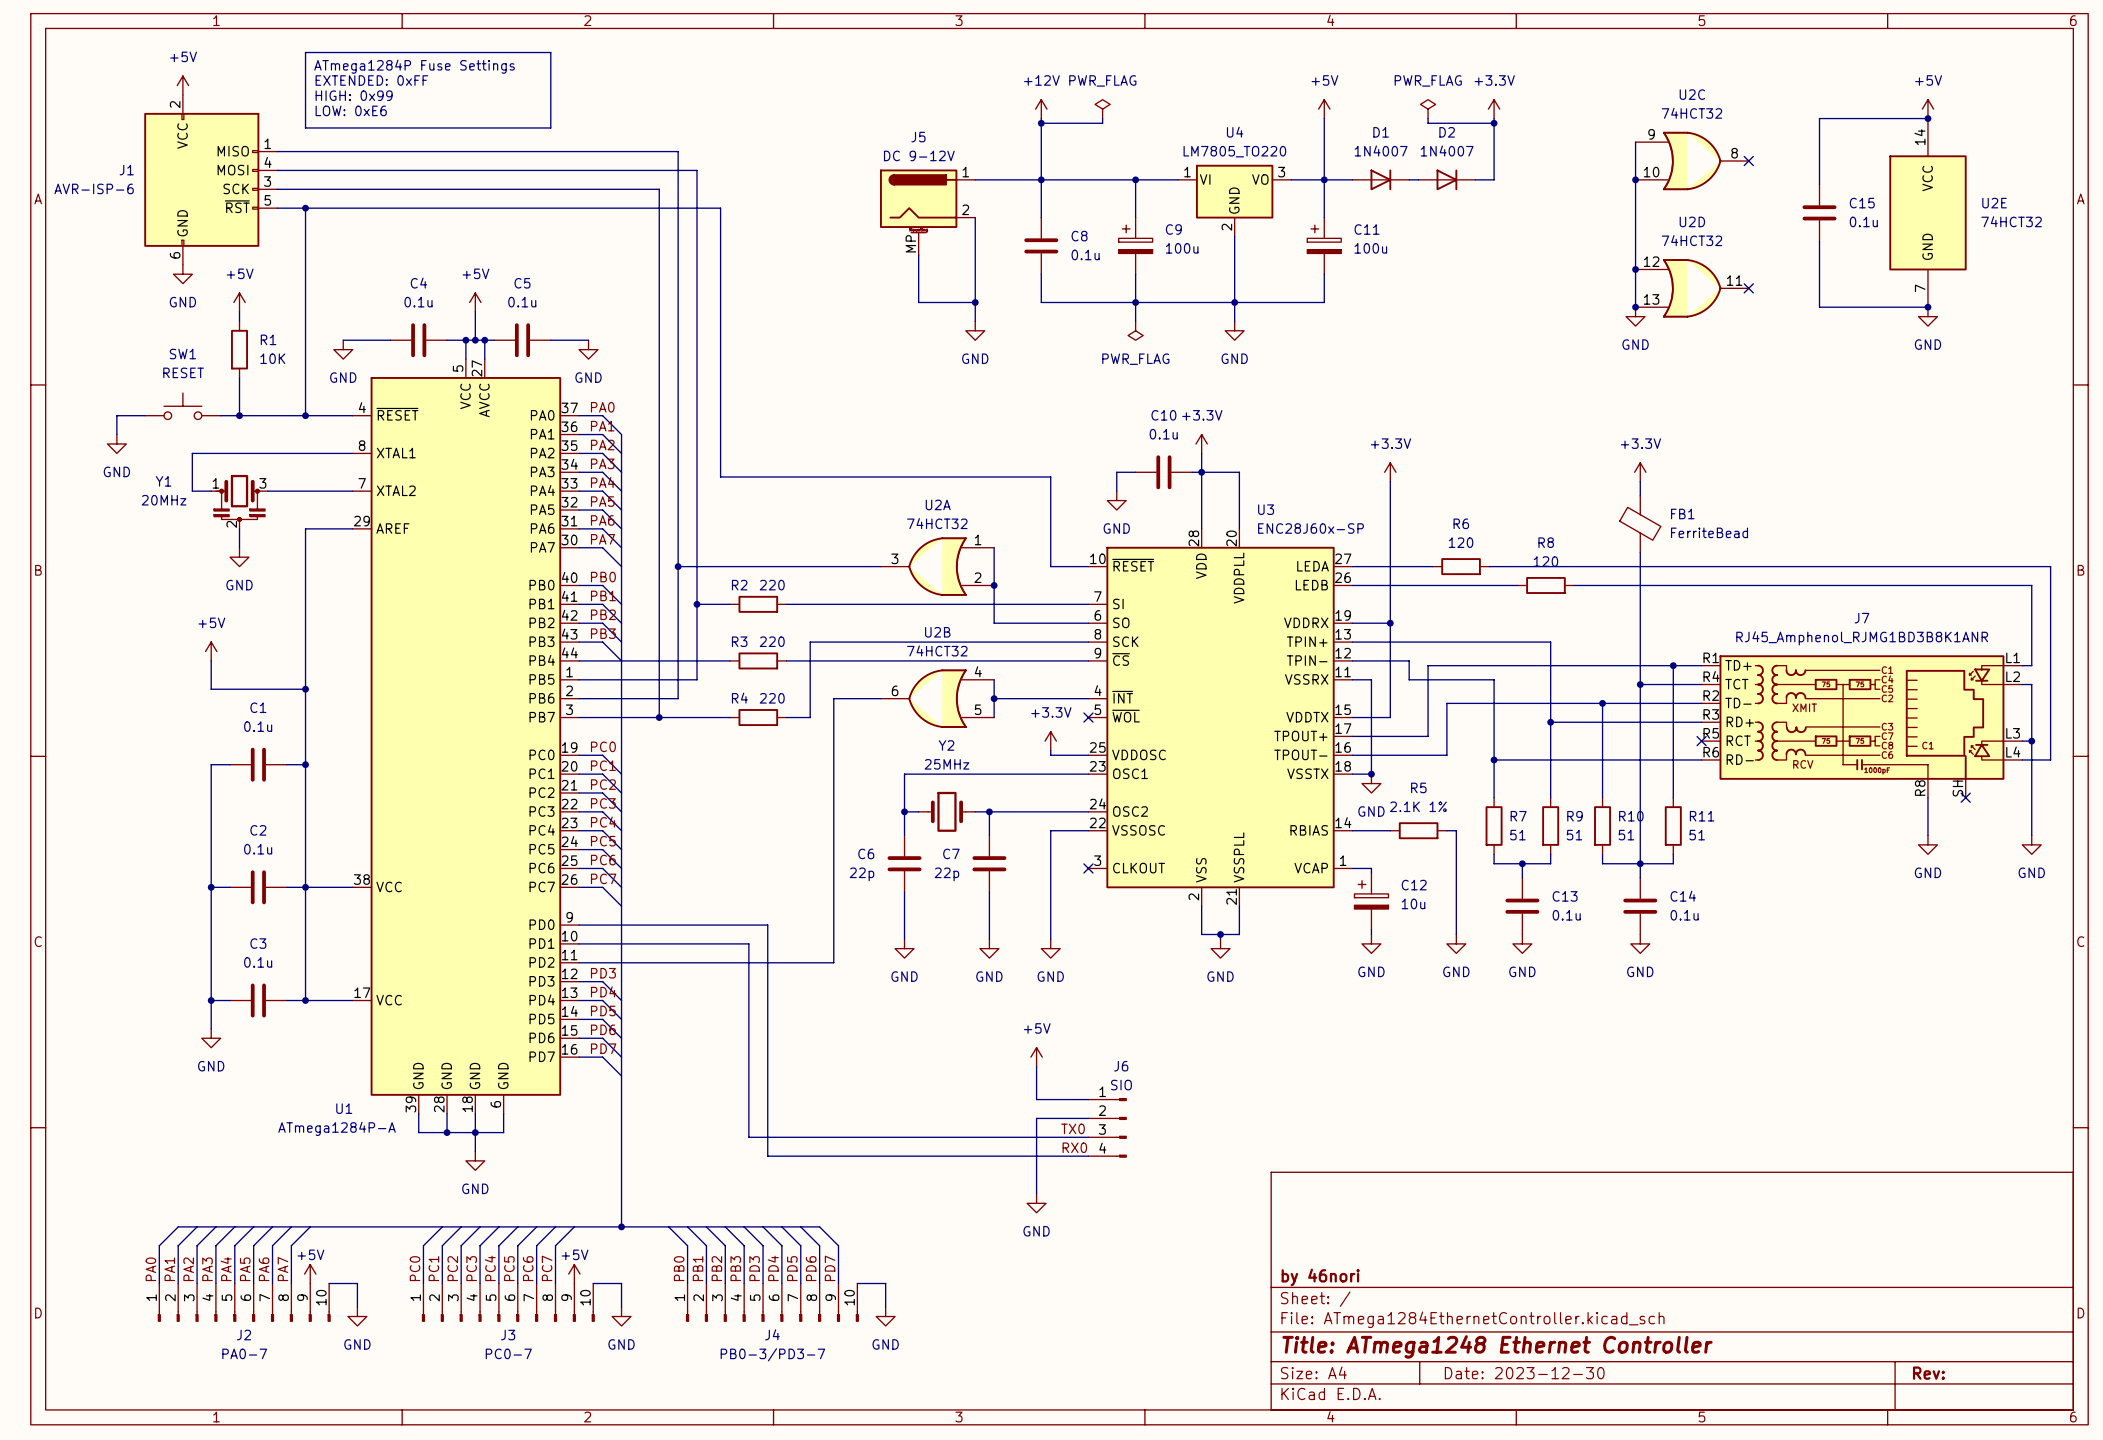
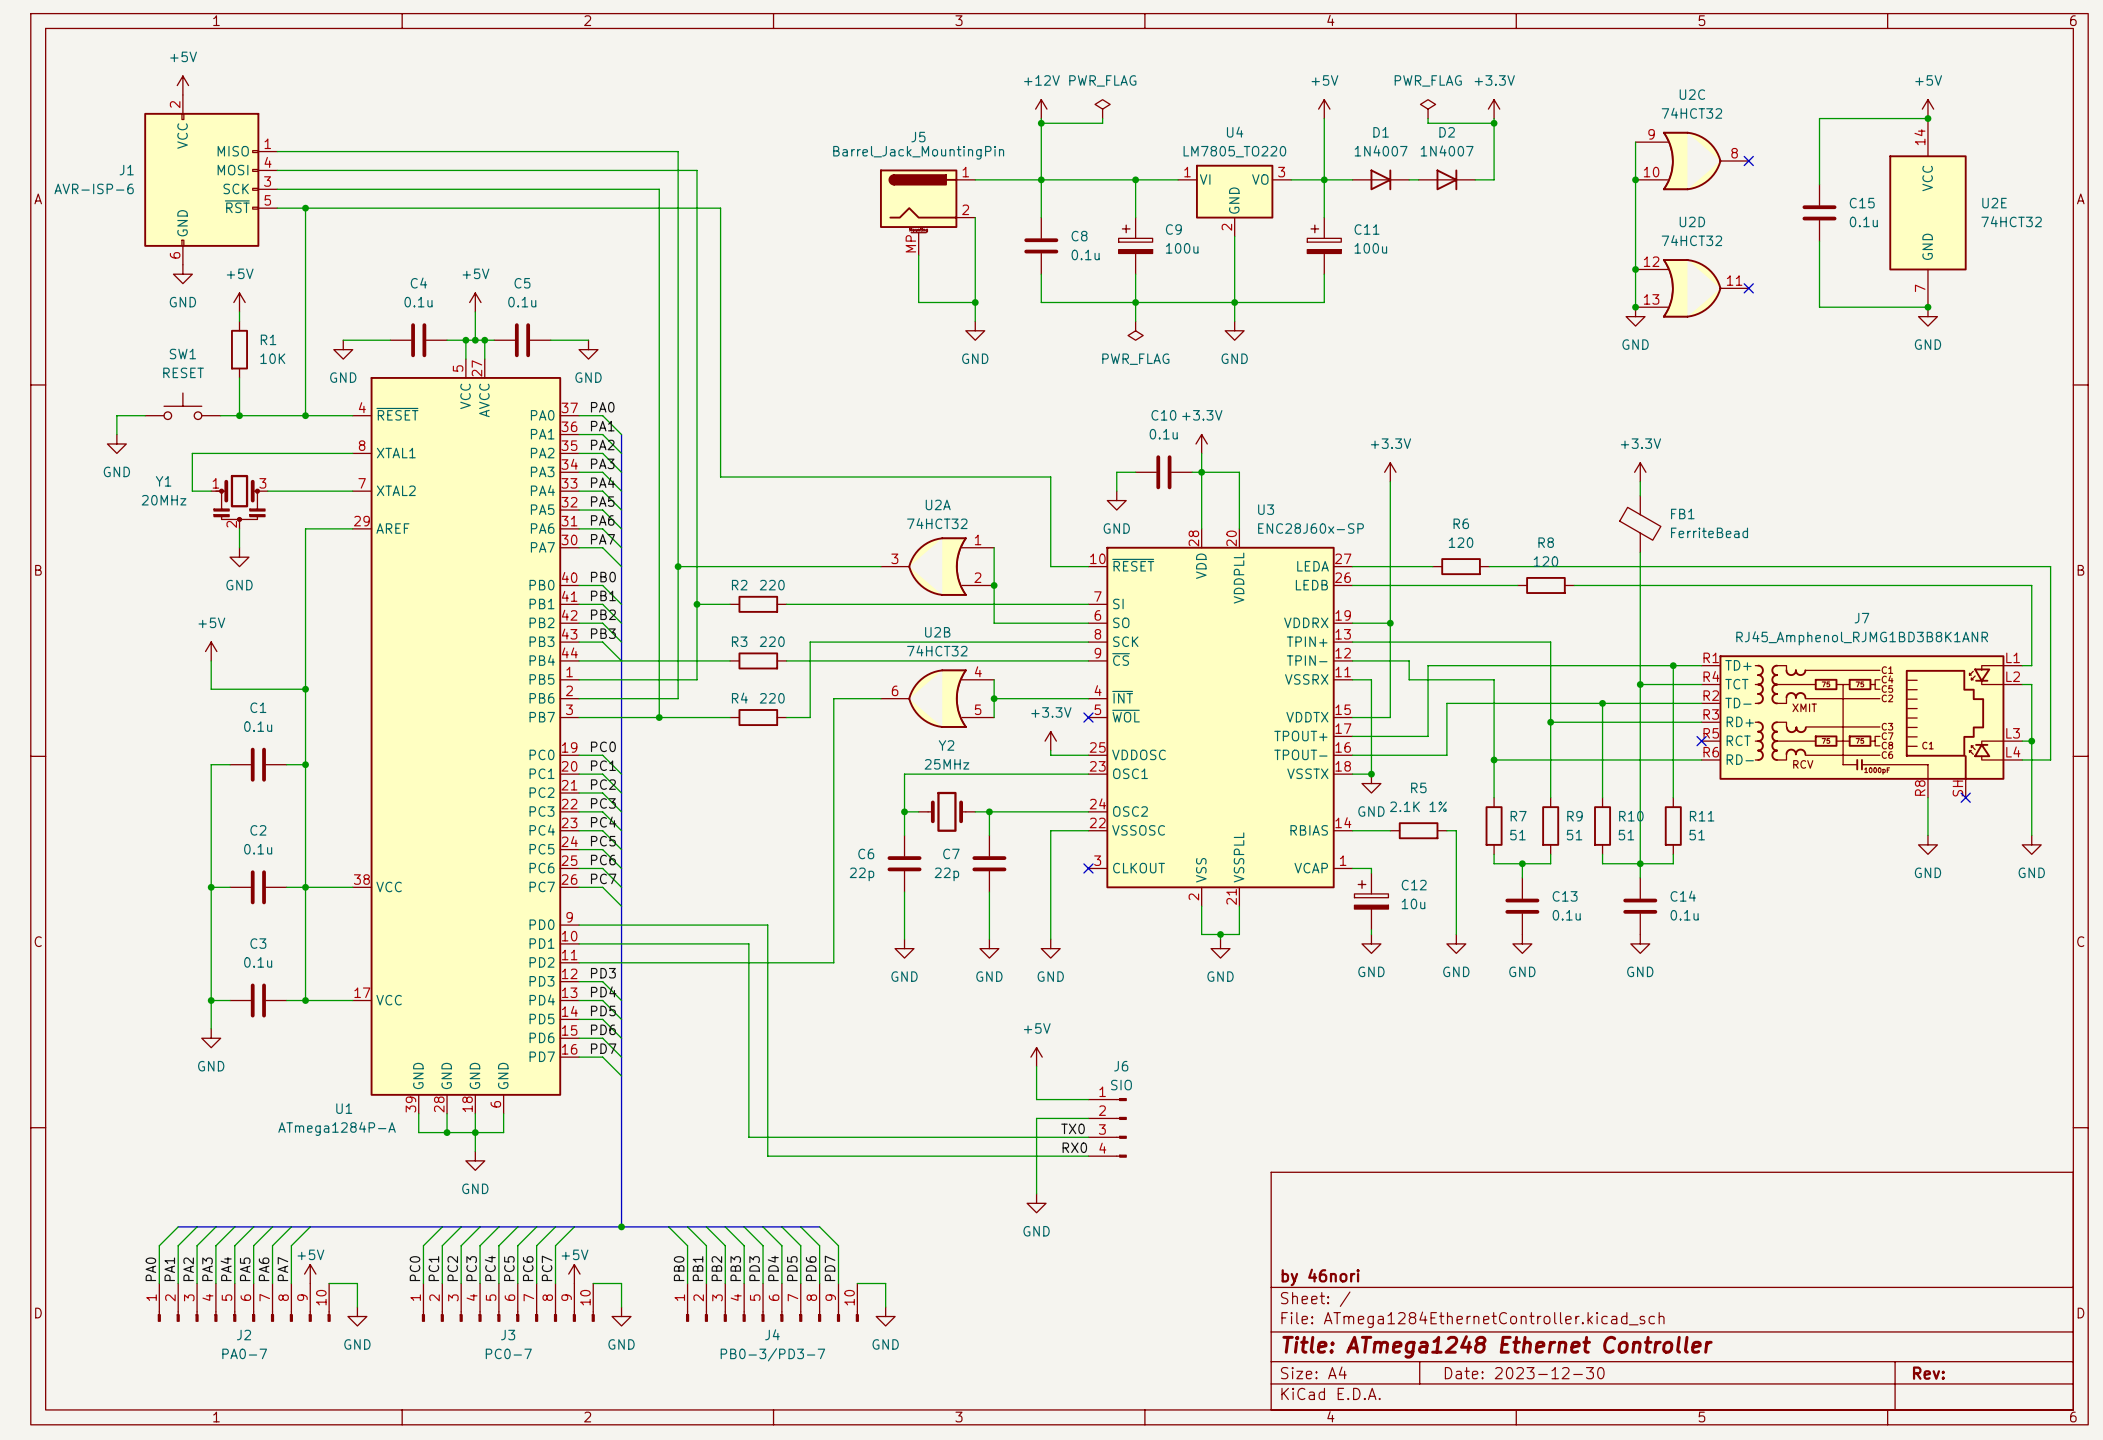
line: (305, 52) (550, 52) (550, 127) (305, 127) (305, 52) -> none
text: ATmega1284P Fuse Settings (414, 66) -> none
text: EXTENDED: 0xFF (371, 80) -> none
text: HIGH: 0x99 (354, 95) -> none
text: LOW: 0xE6 (351, 110) -> none
J5 value: DC 9-12V (919, 155) -> Barrel_Jack_MountingPin (918, 152)

